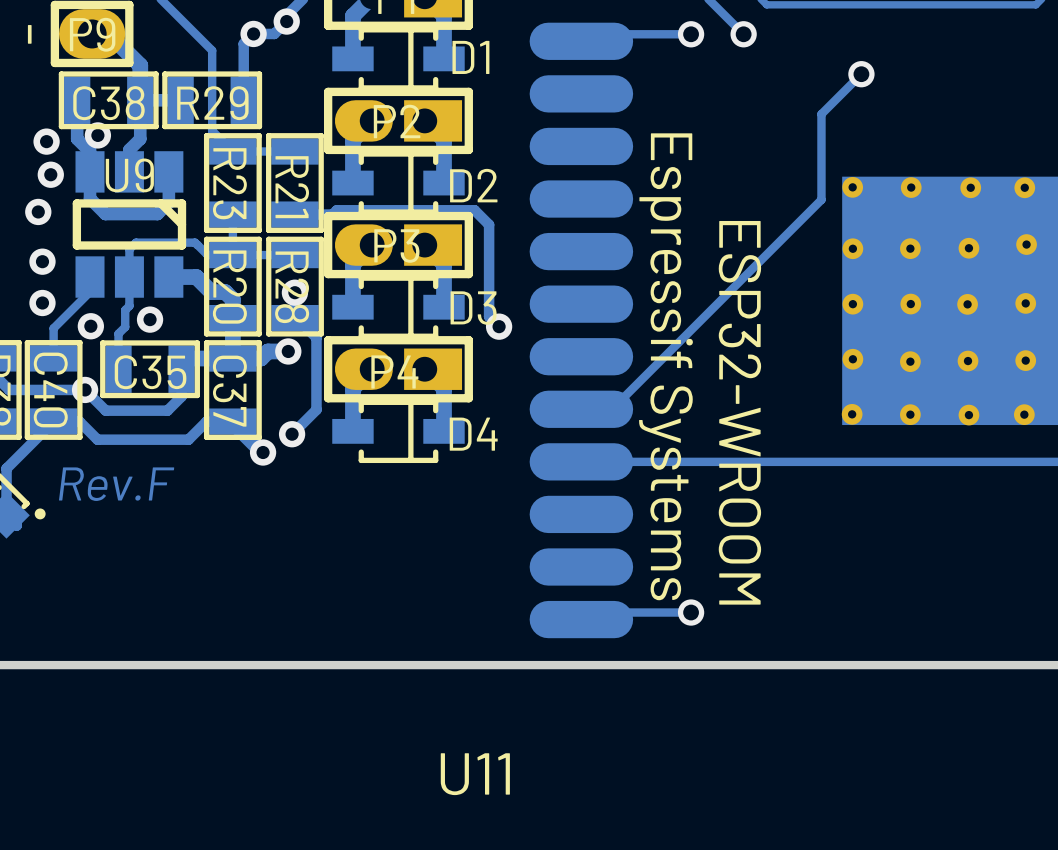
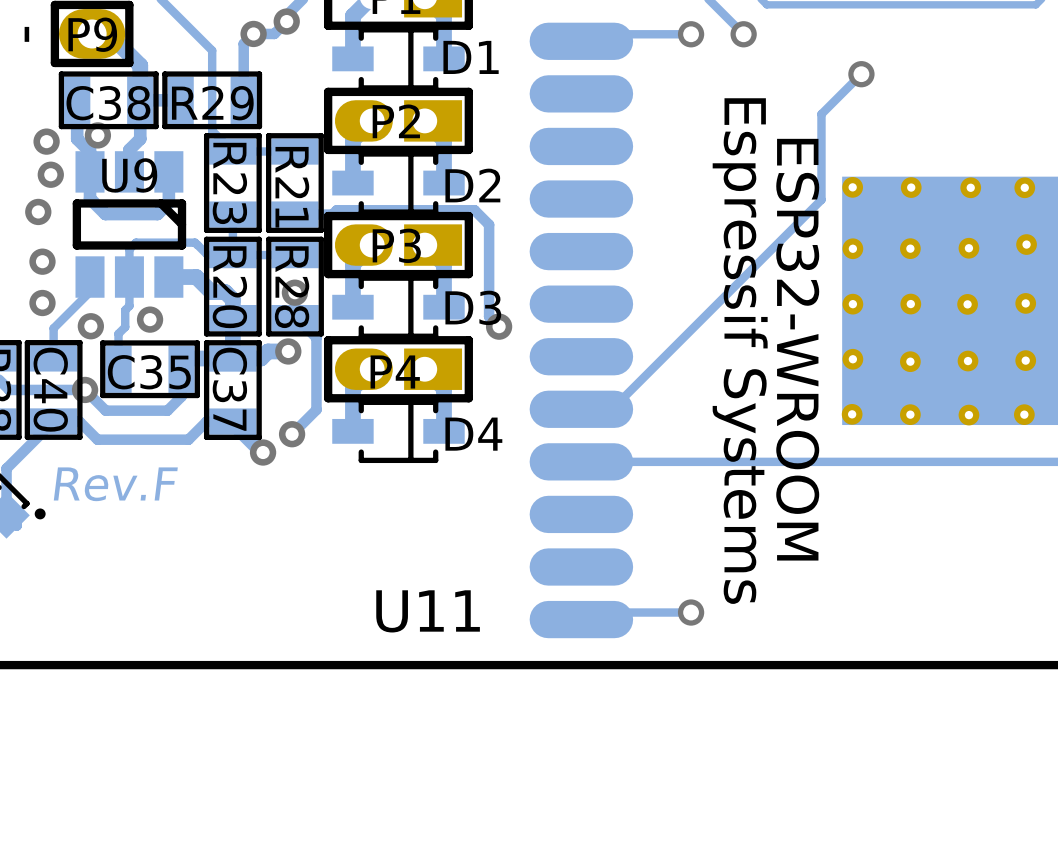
U11 text position: Espressif Systems (665, 366) -> Espressif Systems (740, 351)
U11 text position: ESP32-WROOM (739, 412) -> ESP32-WROOM (797, 349)
U11 name position: U11 (475, 774) -> U11 (428, 611)

